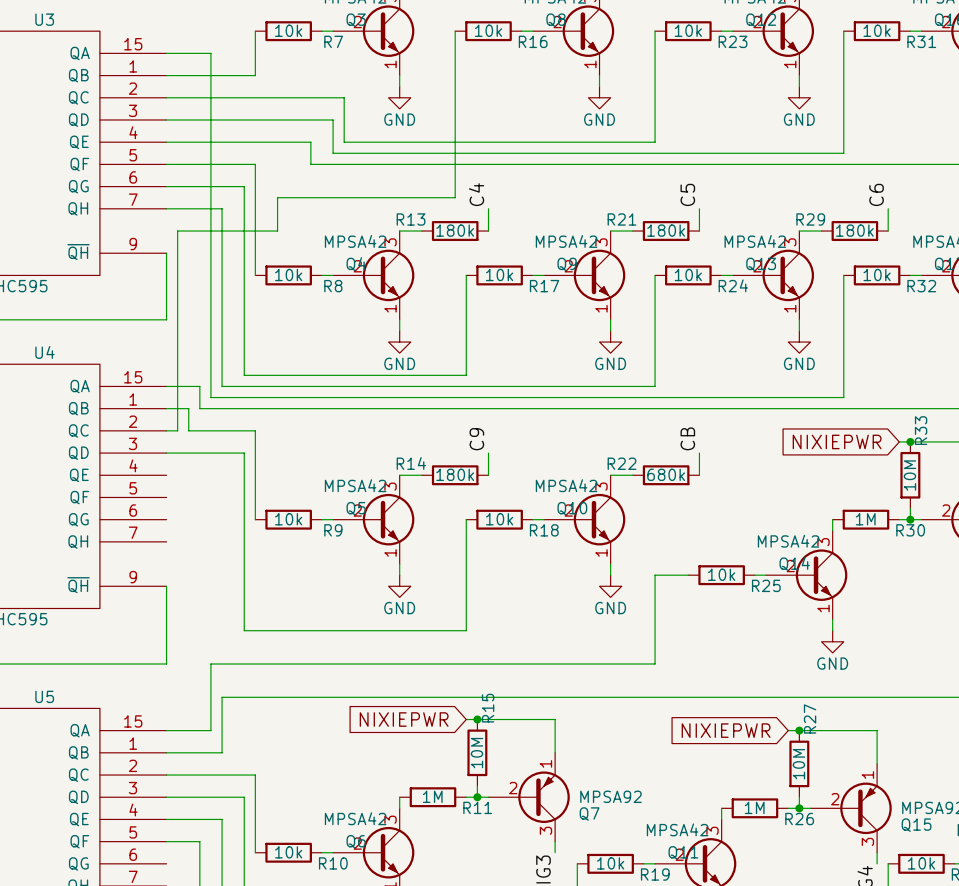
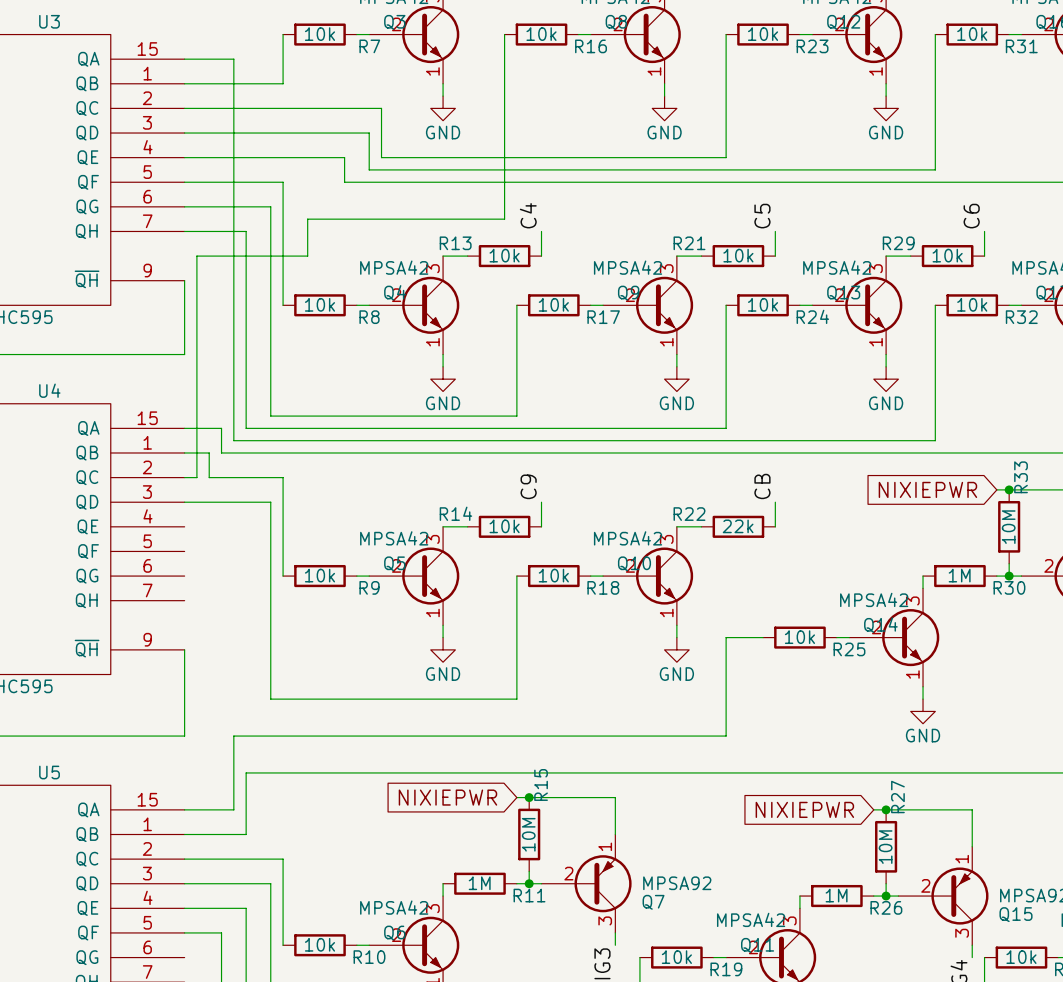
R13 value: 180k (455, 230) -> 10k (504, 255)
R21 value: 180k (666, 230) -> 10k (738, 255)
R29 value: 180k (854, 230) -> 10k (947, 255)
R14 value: 180k (455, 474) -> 10k (504, 526)
R22 value: 680k (666, 474) -> 22k (738, 526)

